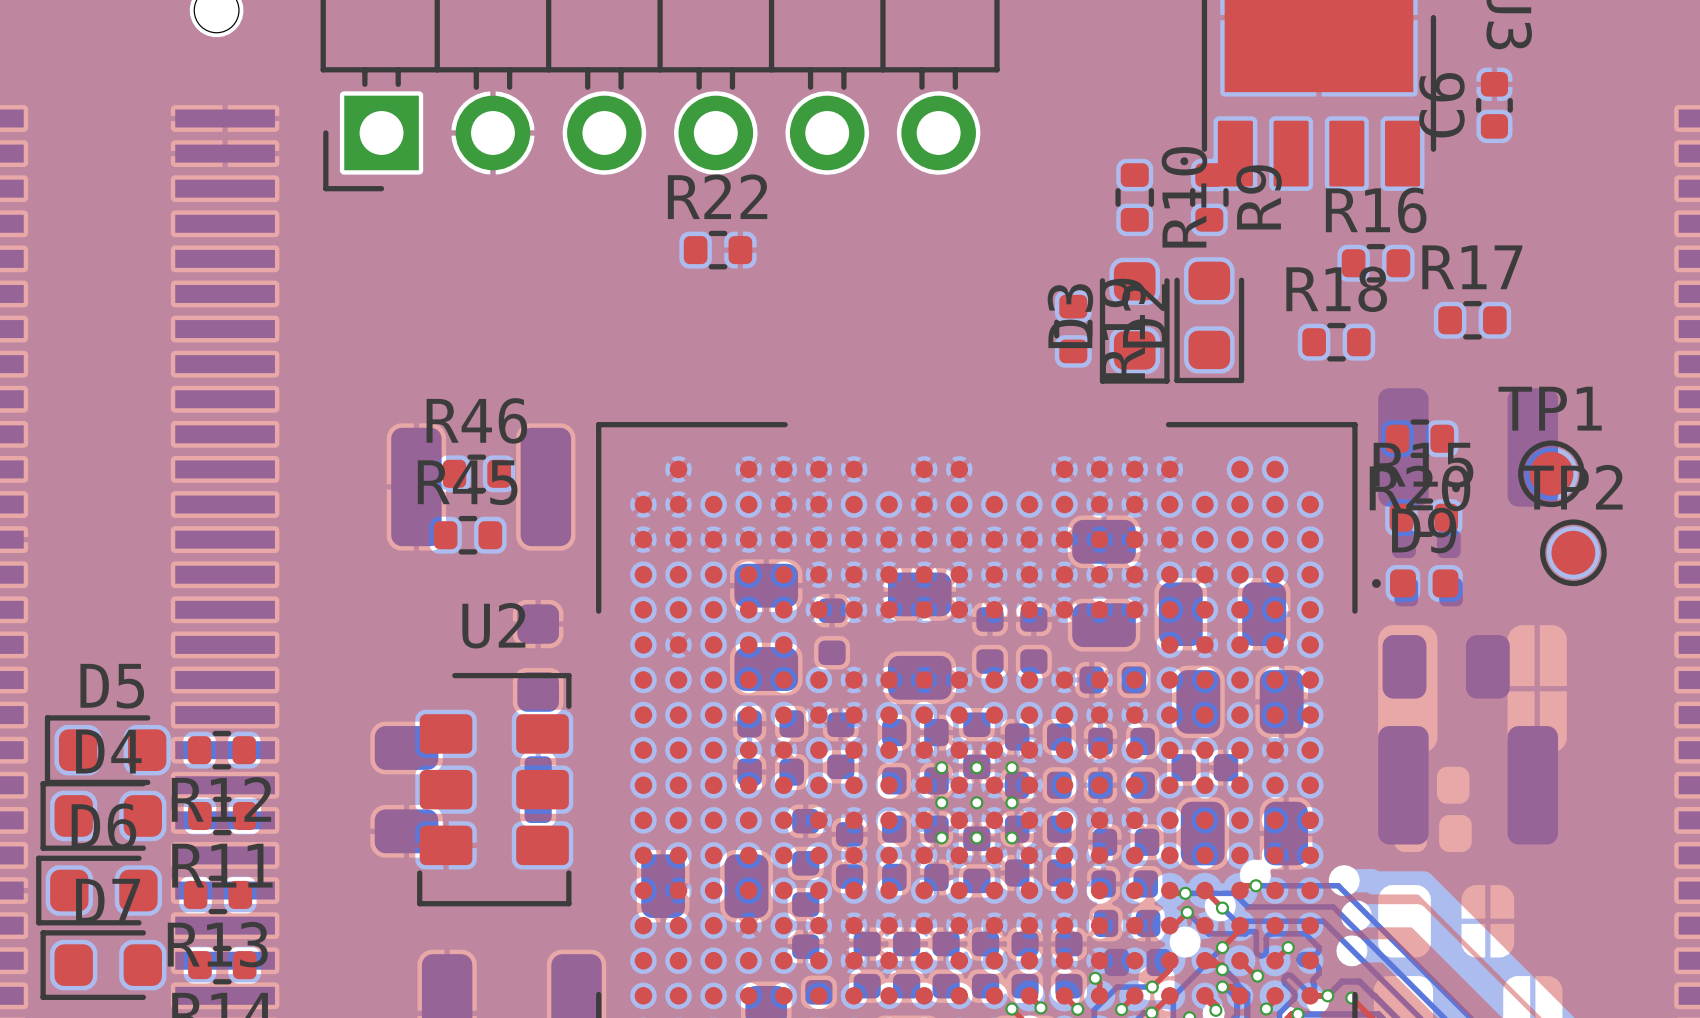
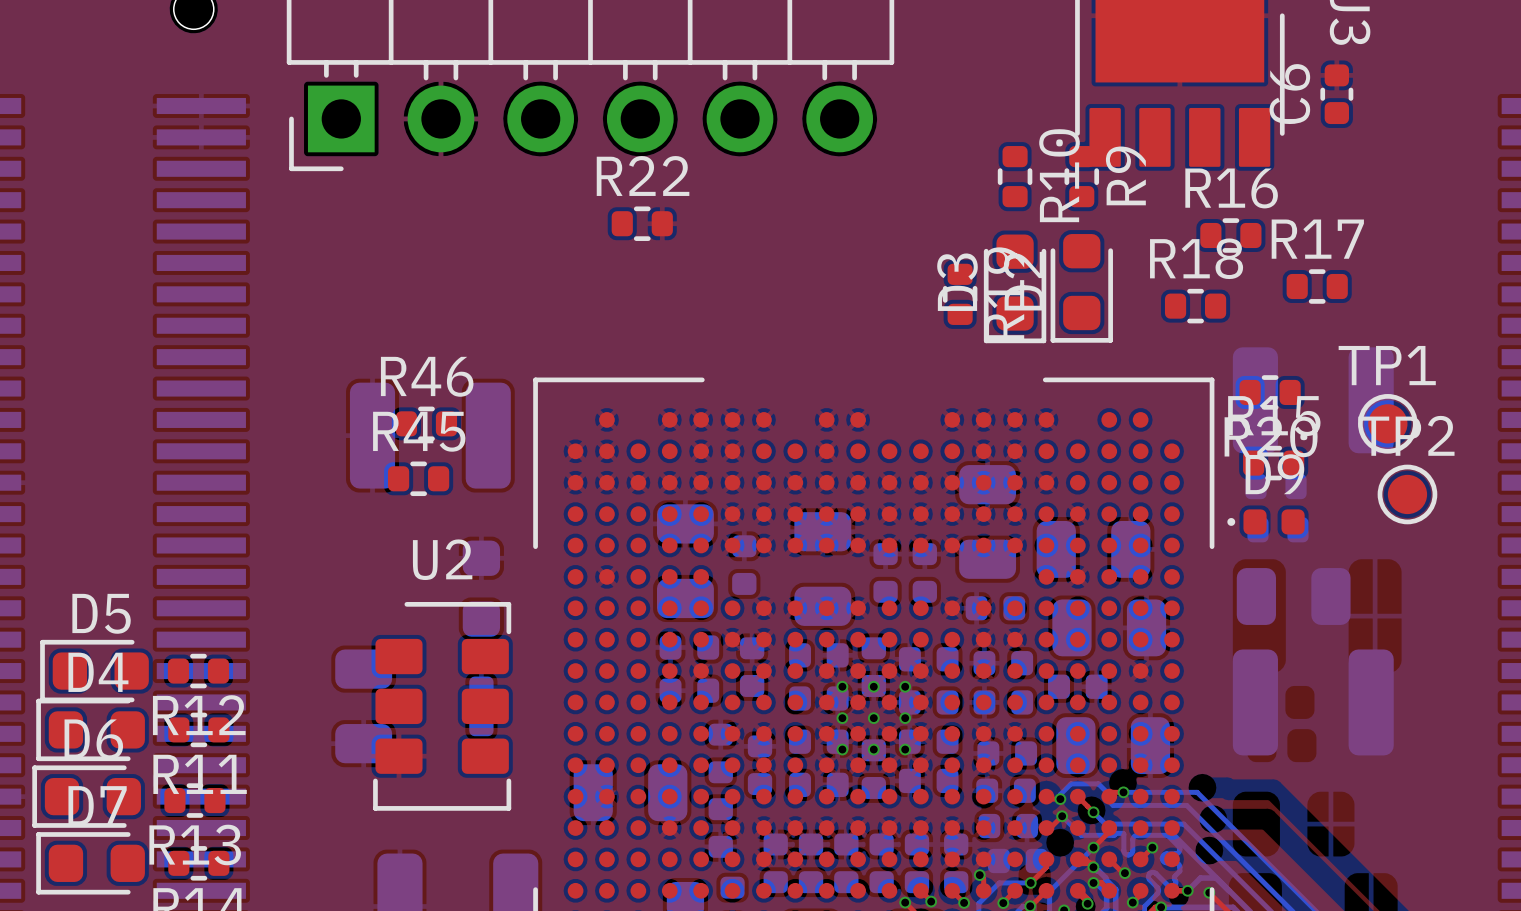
bottom track: (1185, 893) (1234, 893) (1247, 906) (1333, 906) -> (1060, 799) (1060, 794) (1070, 783) (1098, 783) (1107, 792) (1107, 799) (1113, 805) (1186, 805) (1192, 811)

